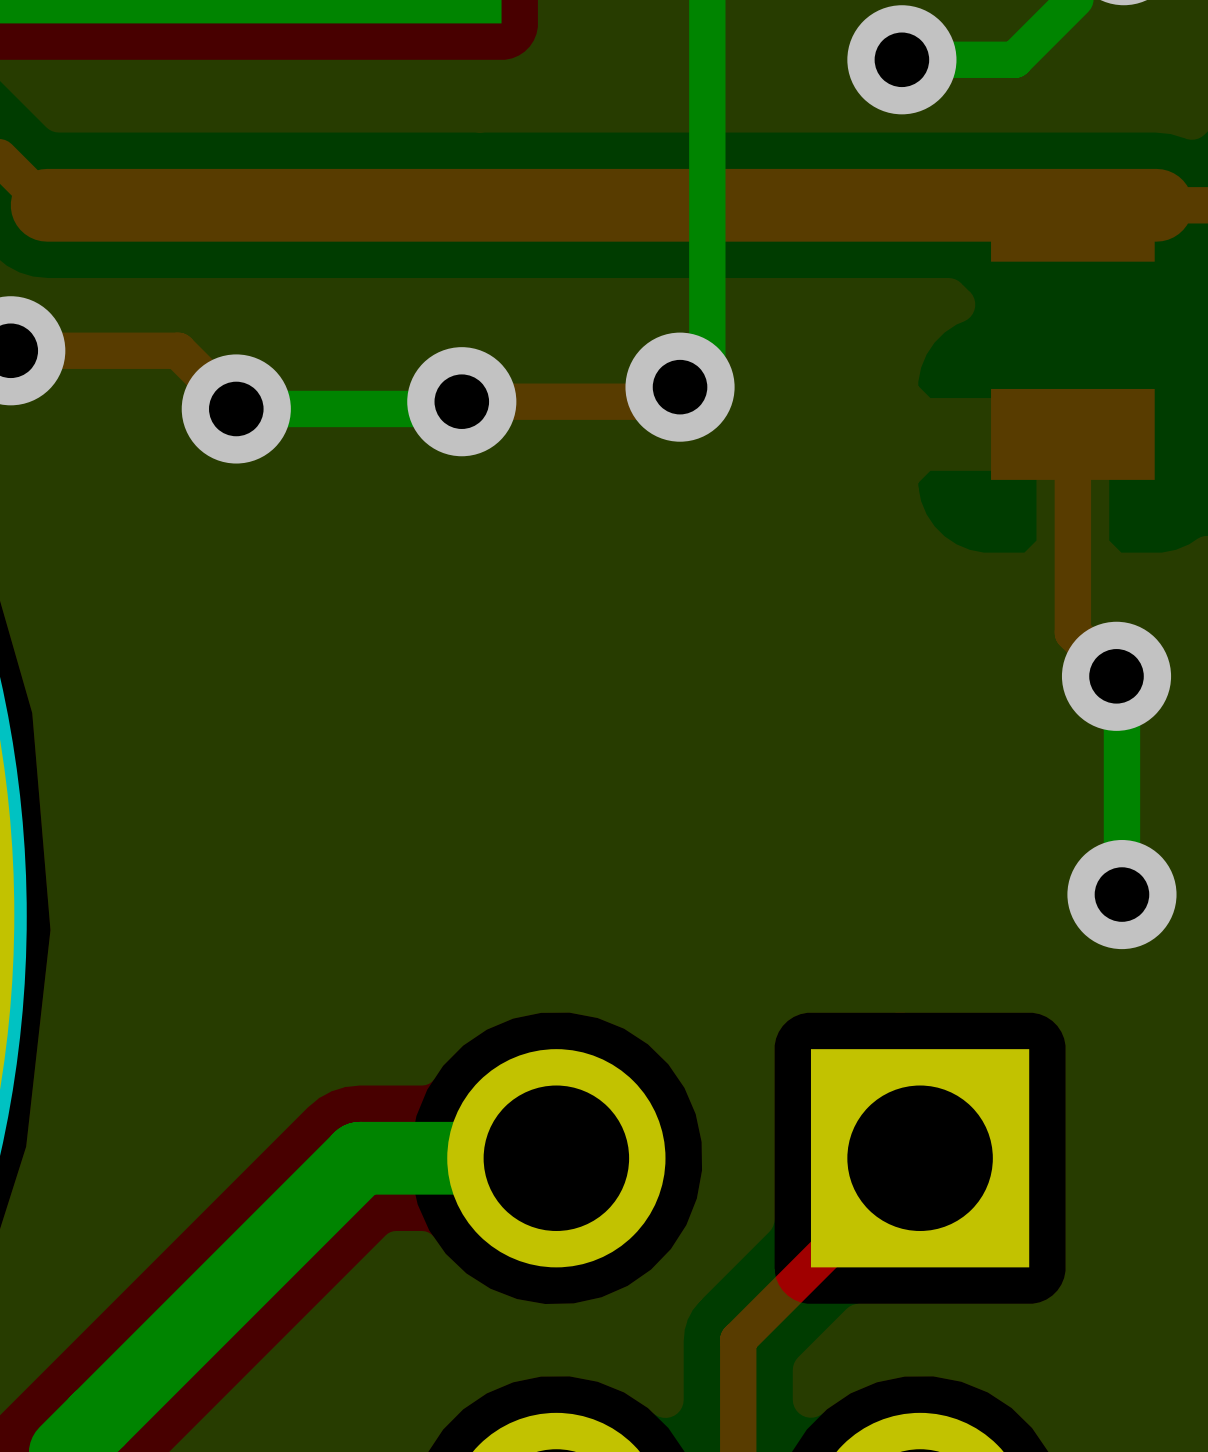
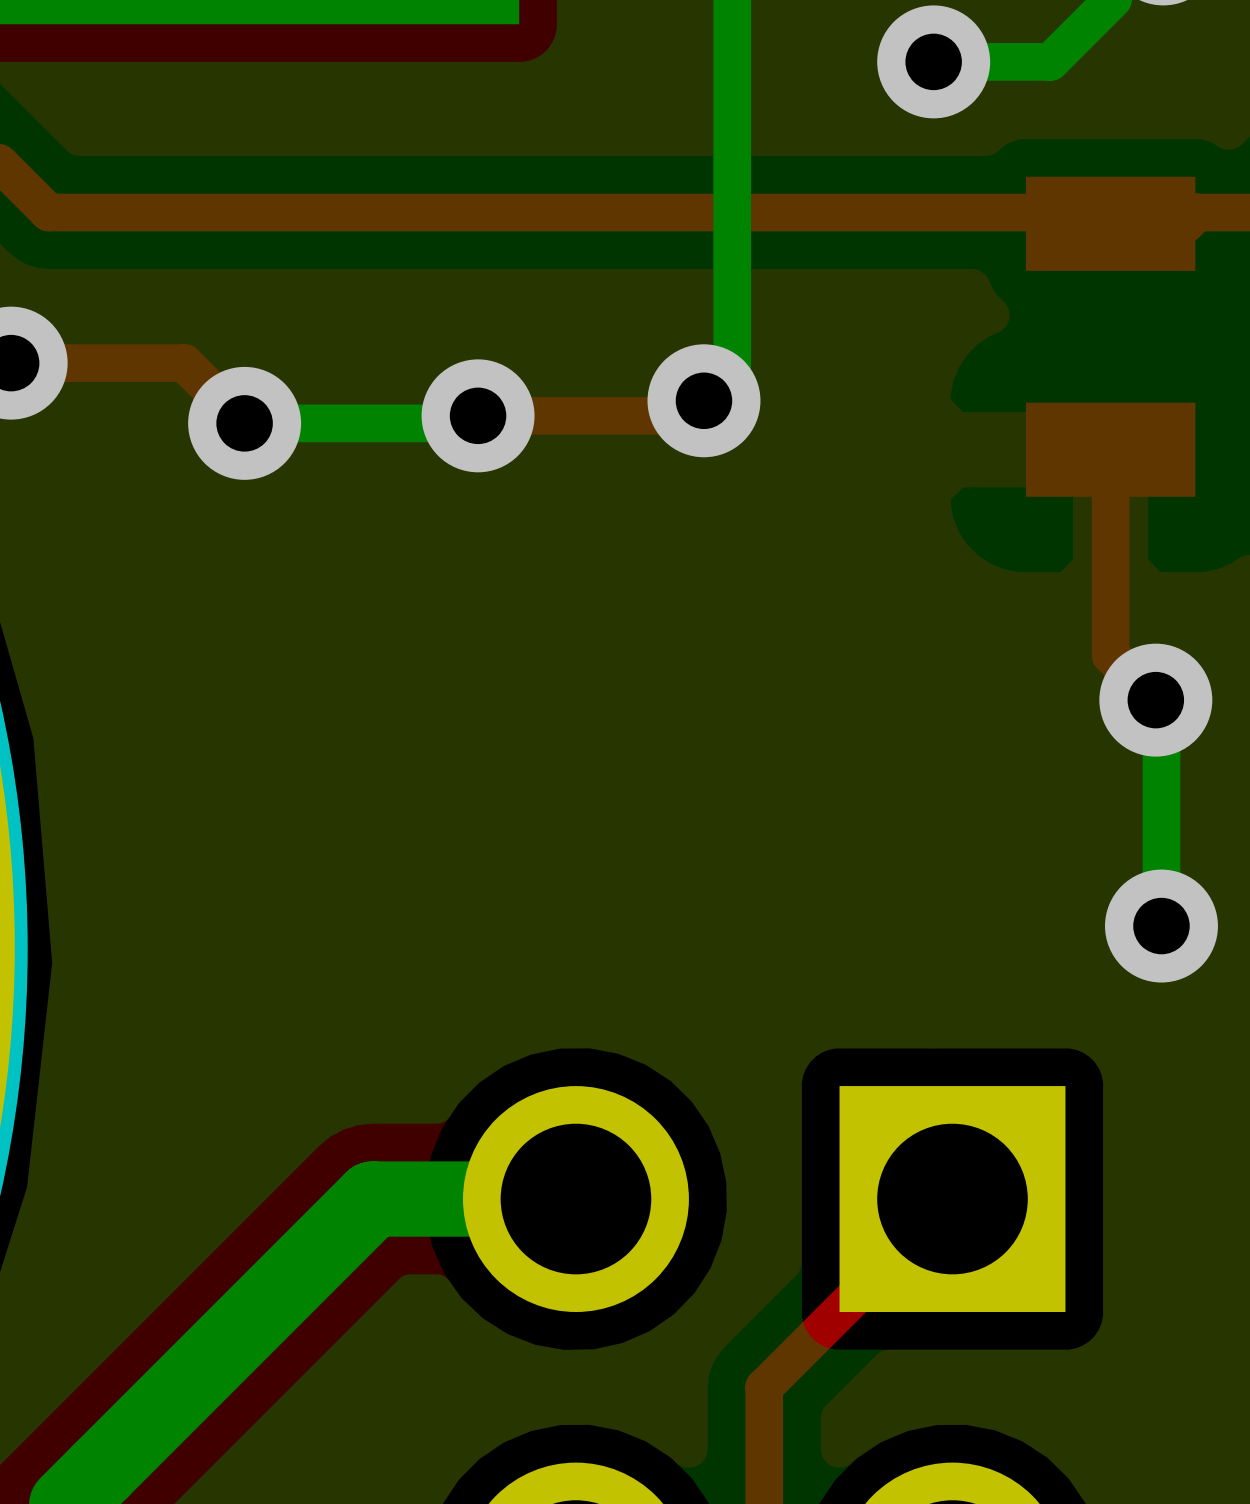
top track width: thick (1156, 205) (47, 205) -> thin (1197, 212) (48, 212)

